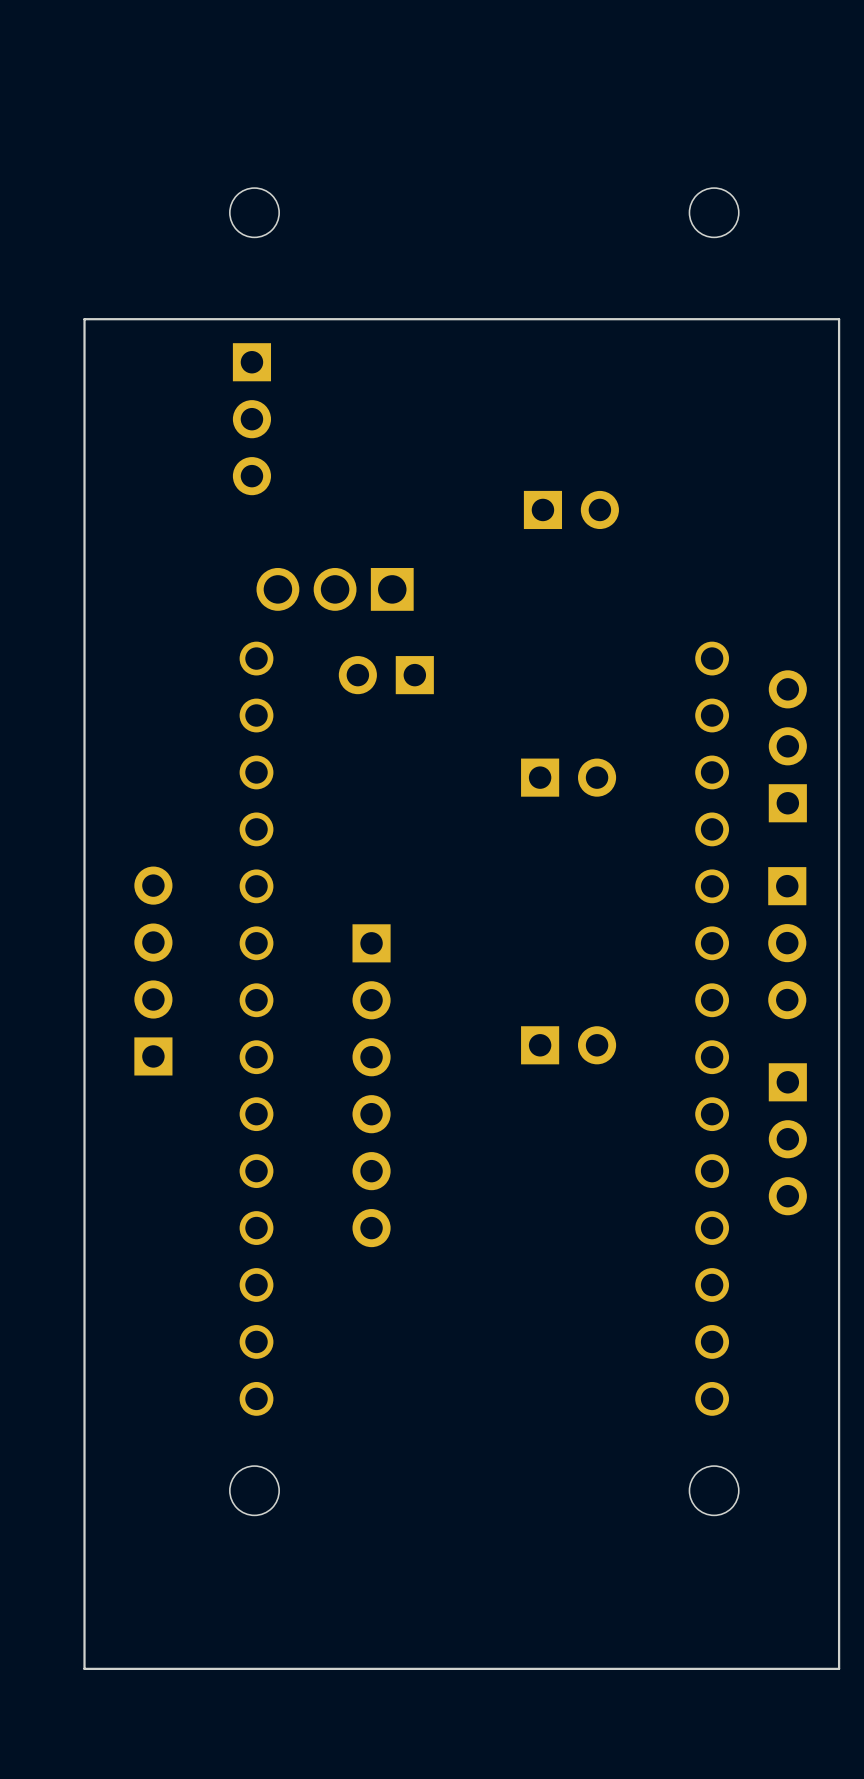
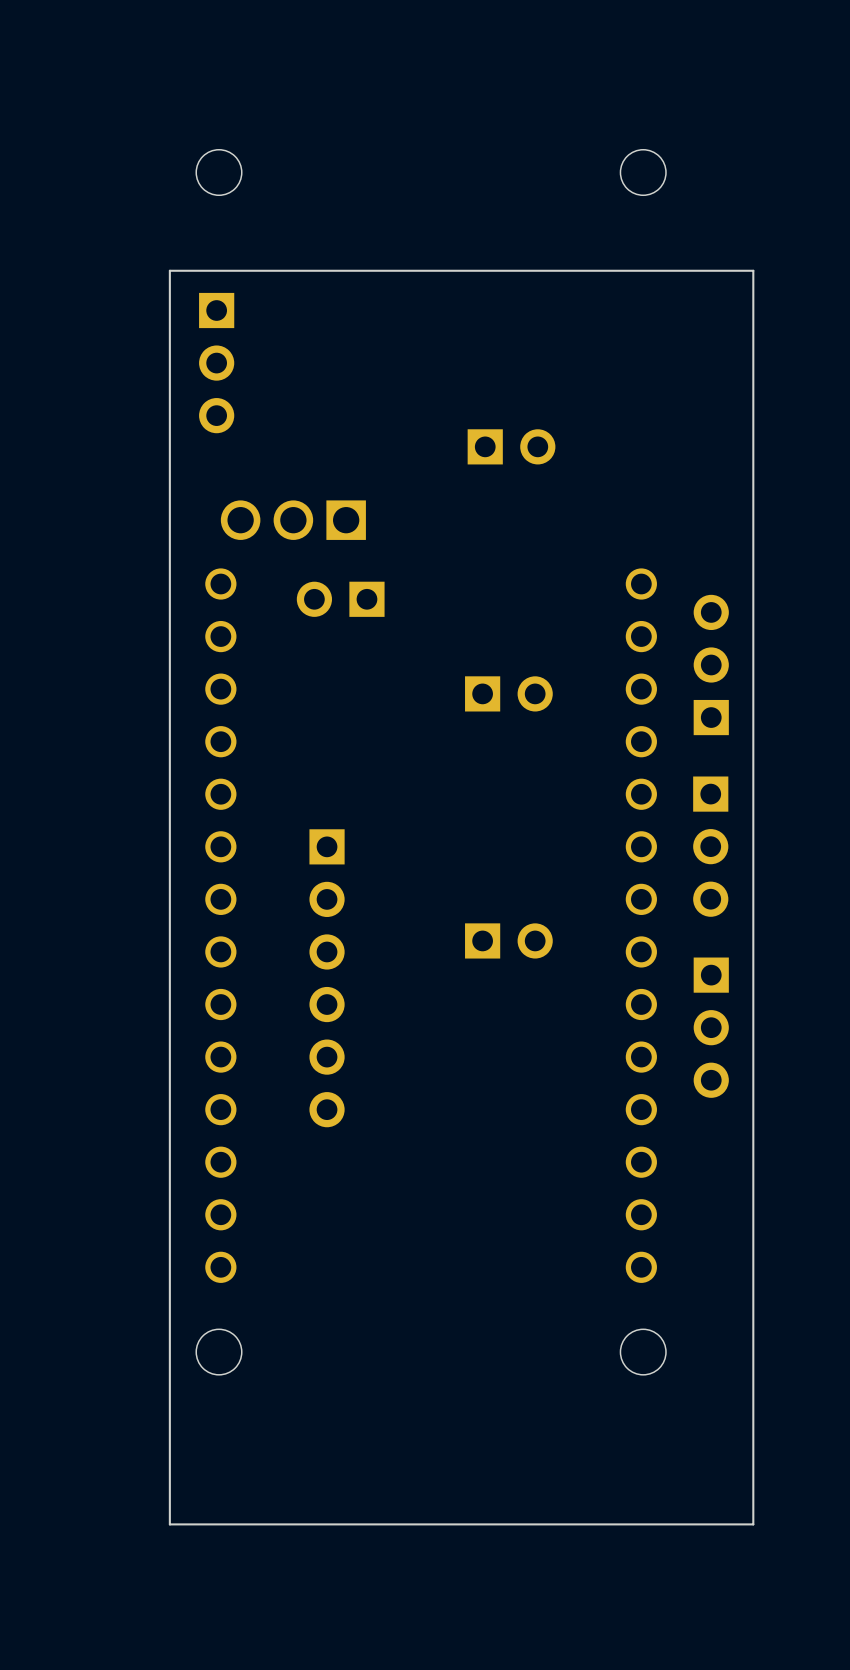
board edge: (833, 319) (839, 319) (839, 1668) (84, 1668) (84, 319) (201, 319) -> (753, 270) (753, 1524) (169, 1524) (169, 270)
part: (153, 971) -> none

